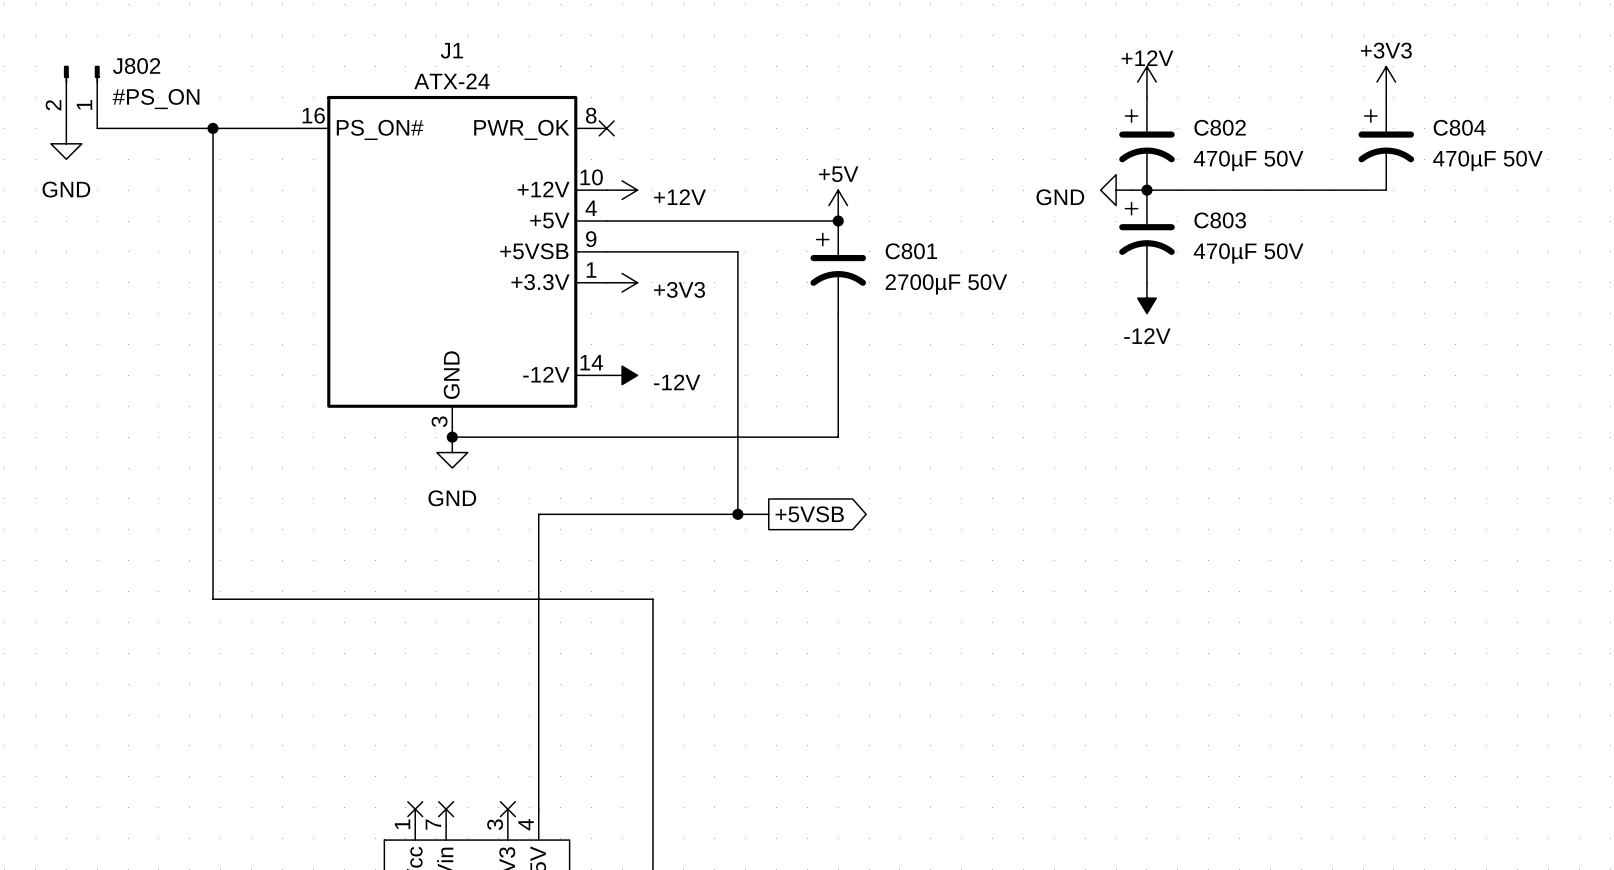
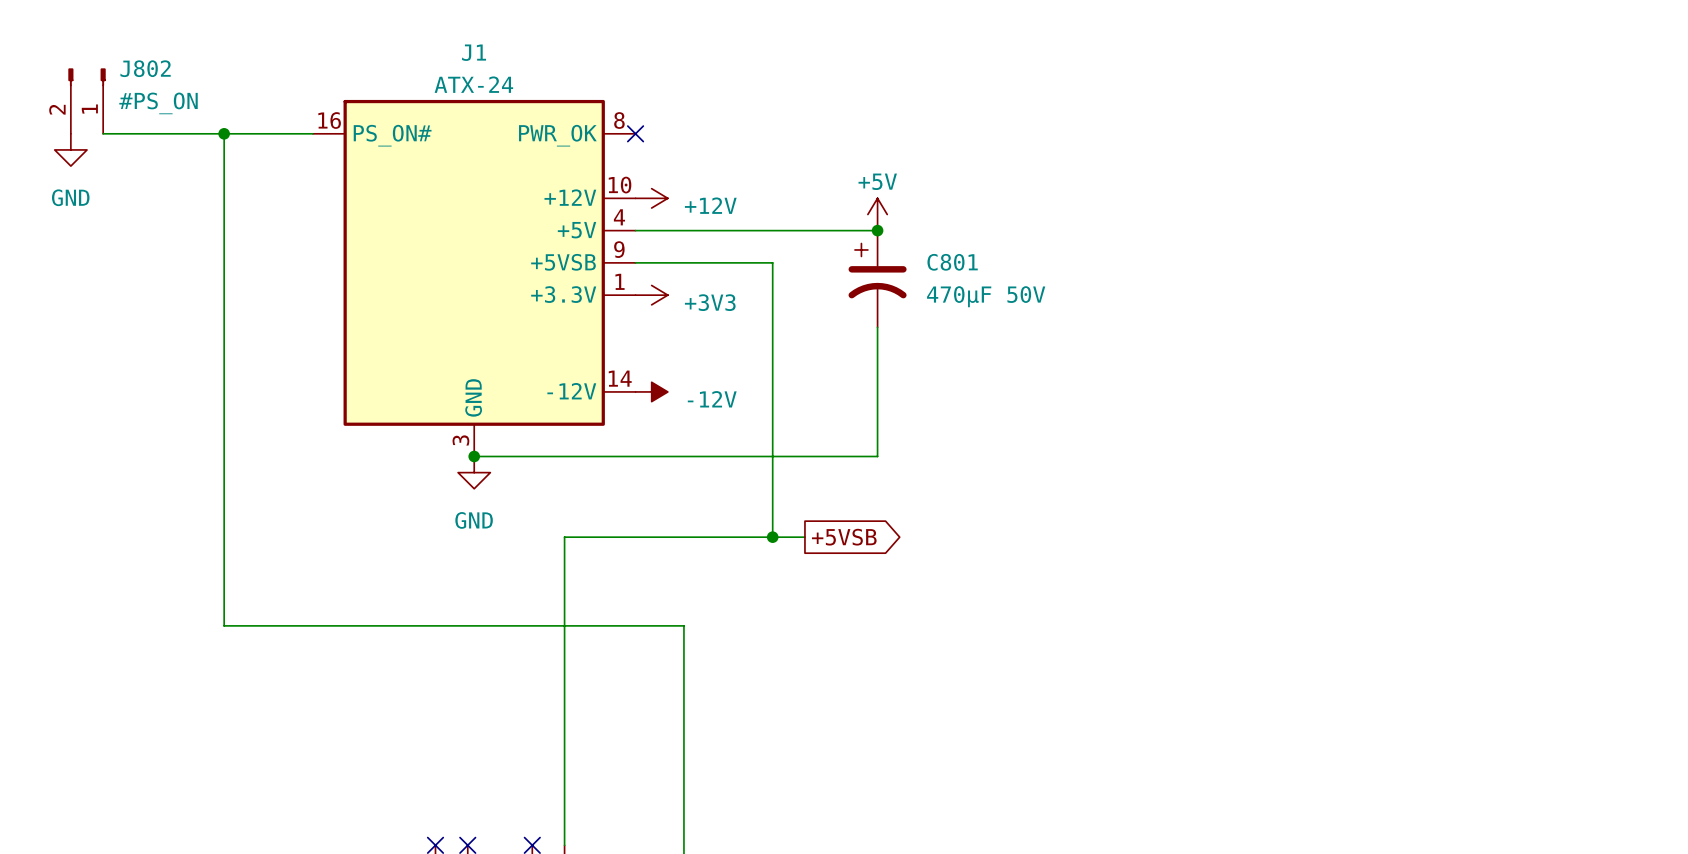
power symbol: +12V (1146, 82) -> none
power symbol: +3V3 (1386, 82) -> none
C802: 470µF 50V (1146, 143) -> none
C804: 470µF 50V (1386, 143) -> none
power symbol: GND (1116, 190) -> none
wire: (1131, 190) (1386, 190) -> none
junction: (1146, 190) -> none
C803: 470µF 50V (1146, 236) -> none
C801 value: 2700µF 50V (946, 284) -> 470µF 50V (986, 296)
power symbol: -12V (1146, 298) -> none

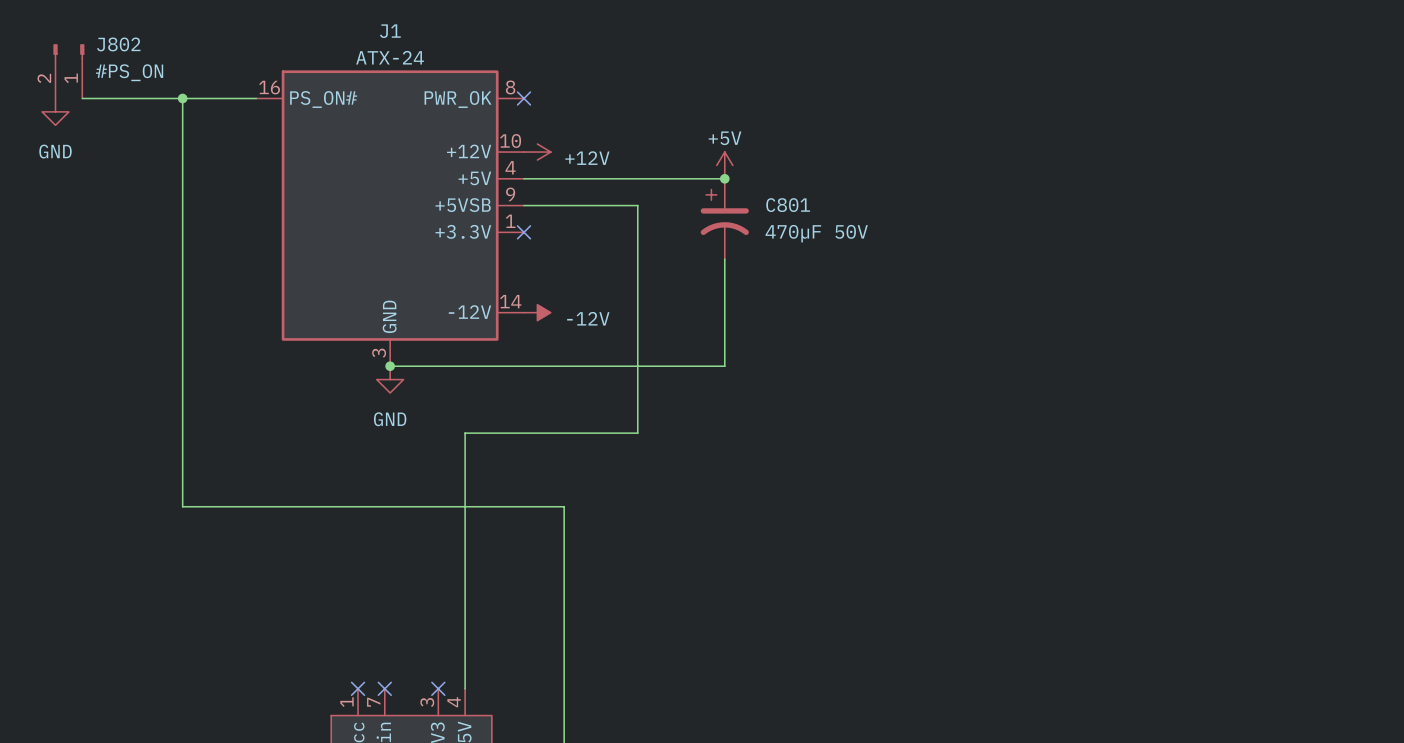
no-connect mark: none -> (524, 232)
power symbol: +3V3 (651, 295) -> none
wire: (772, 537) (804, 537) -> none
junction: (772, 537) -> none
global label: +5VSB (844, 537) -> none

